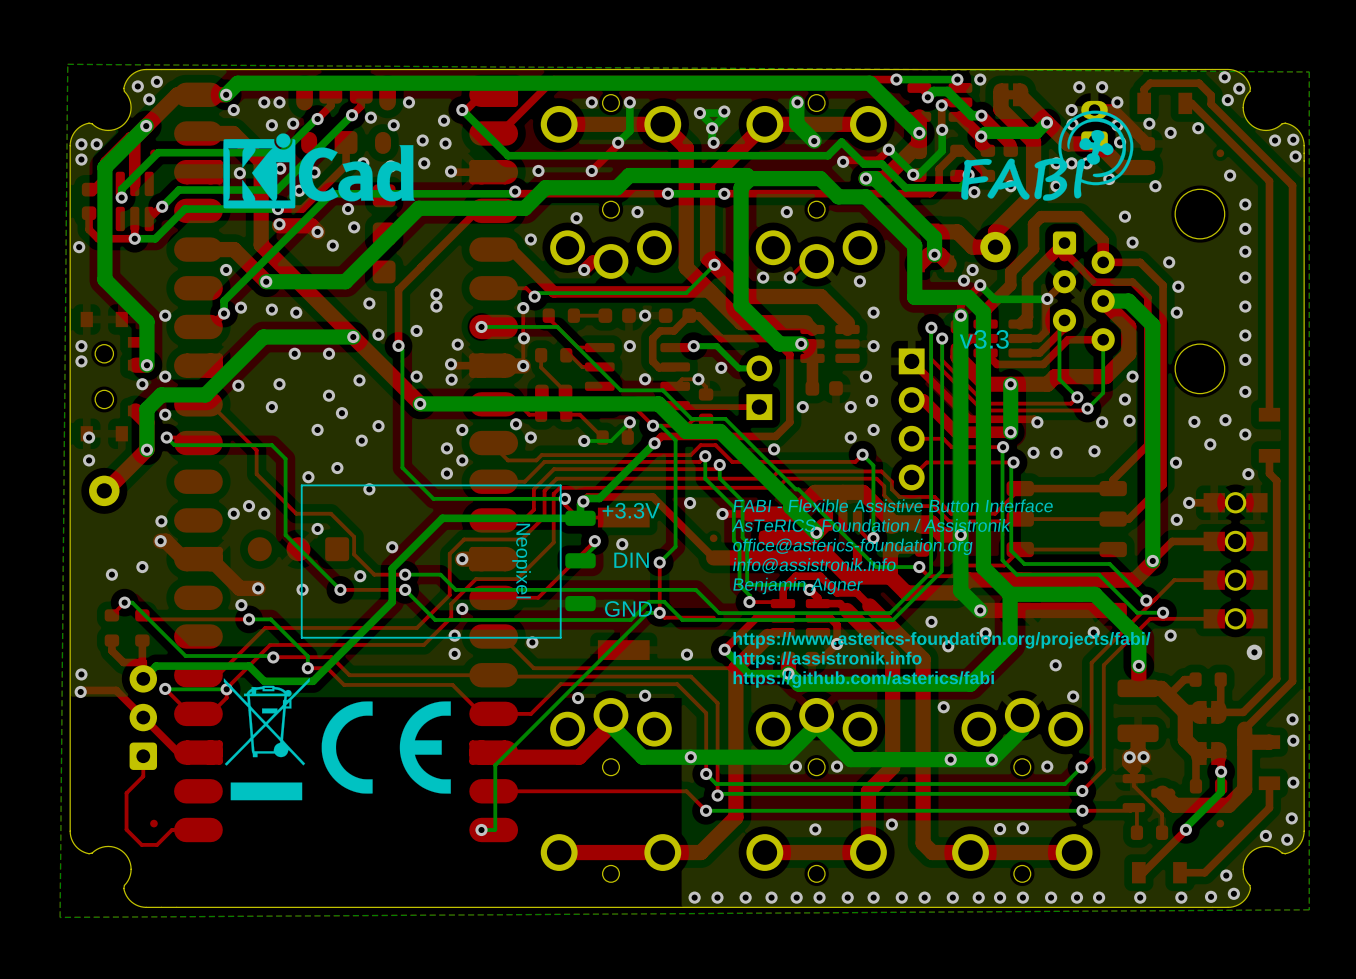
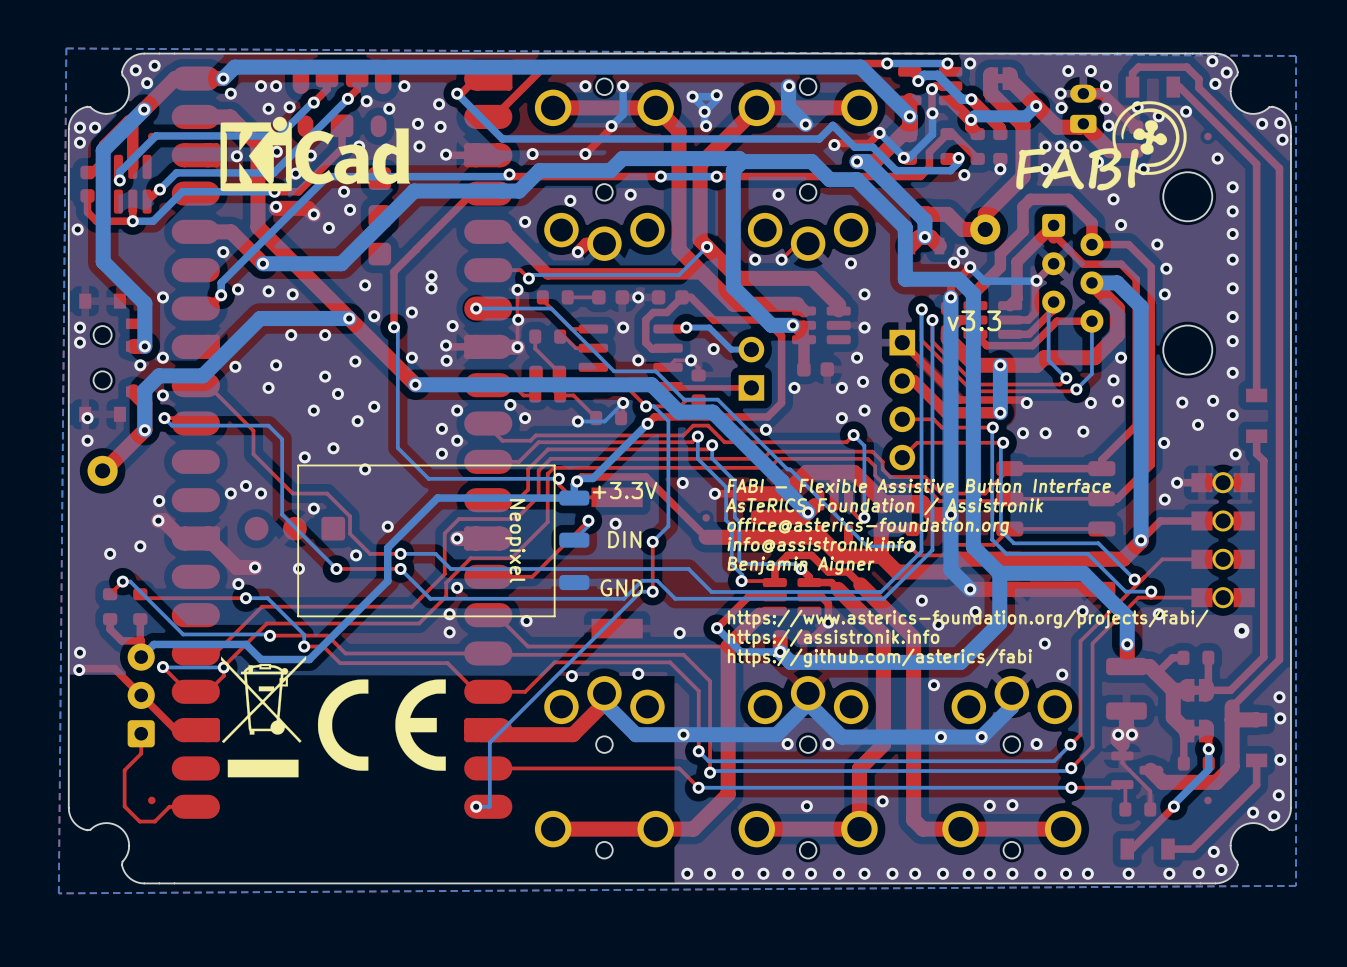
drawing position: (1047, 155) -> (1101, 145)
top track: (659, 612) (664, 617) (713, 617) -> none

